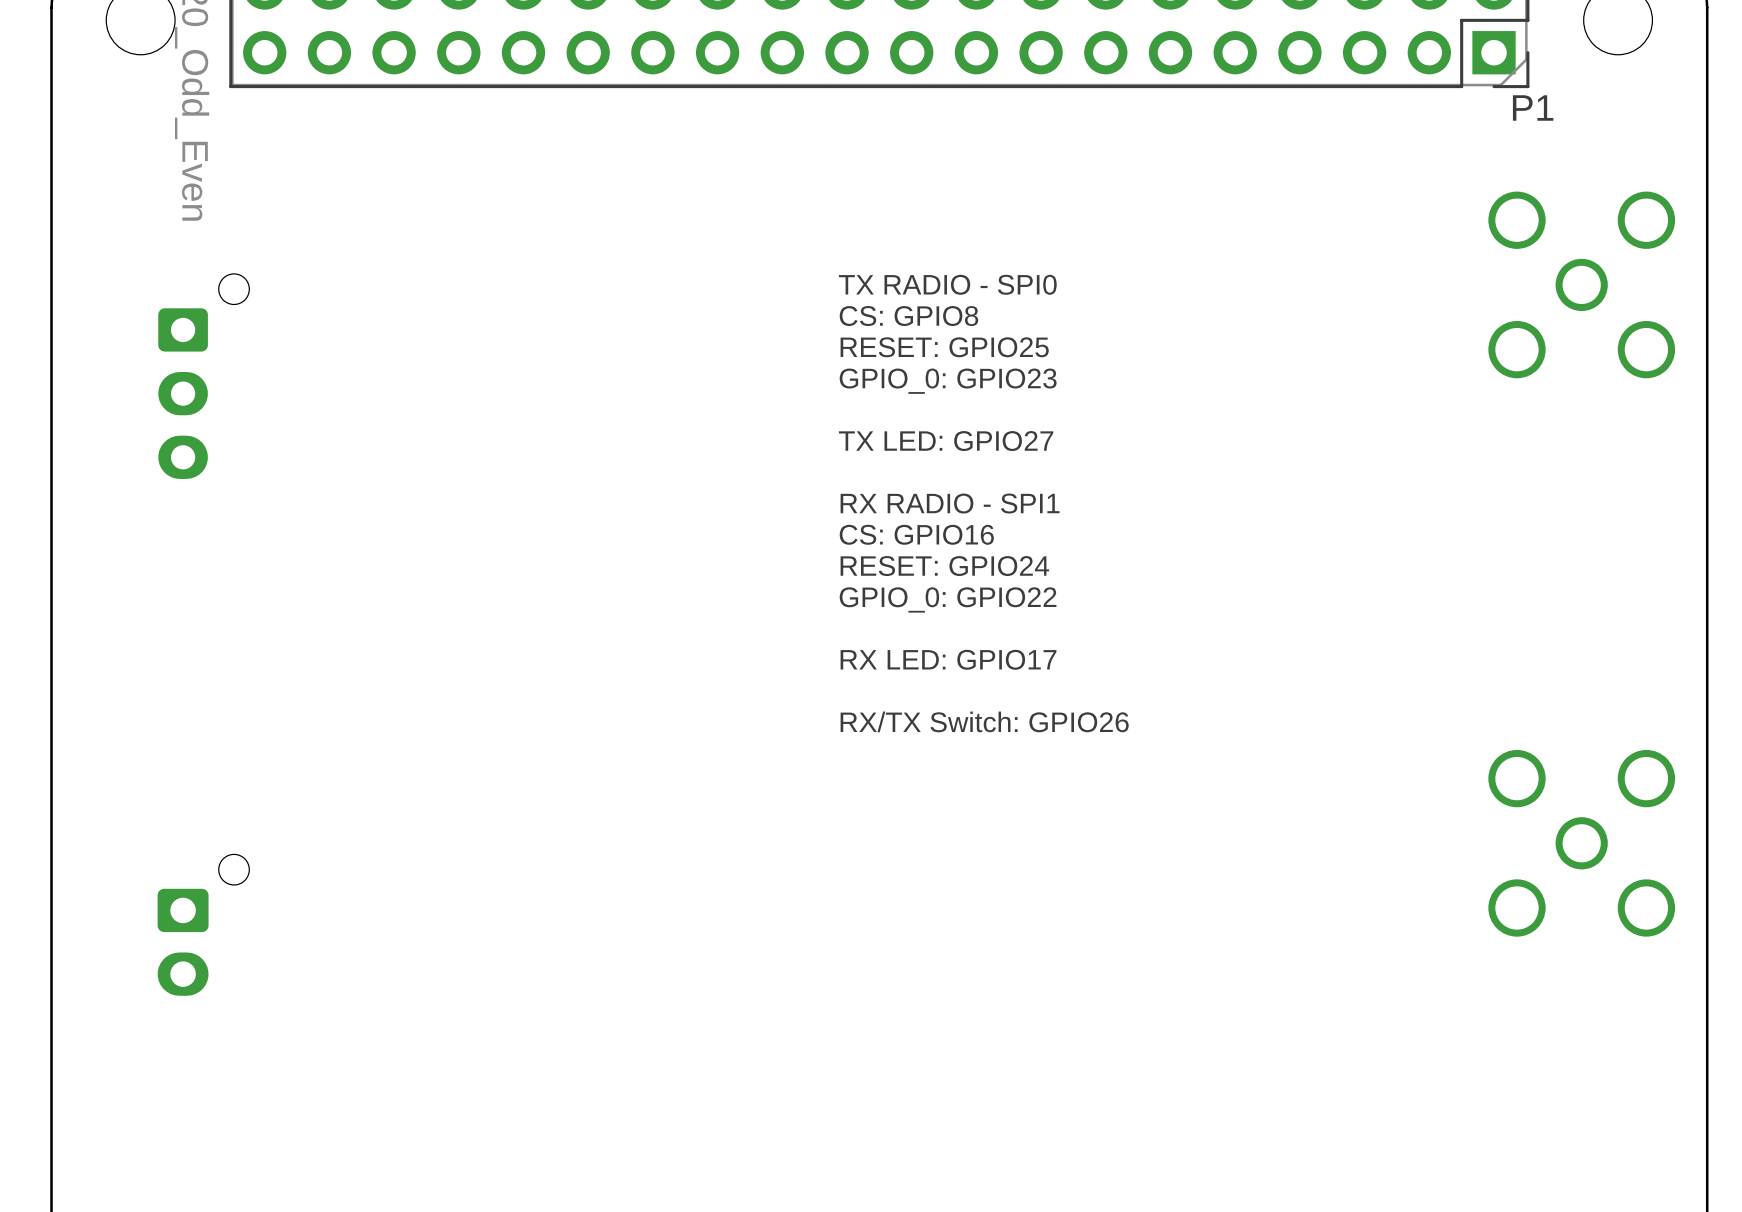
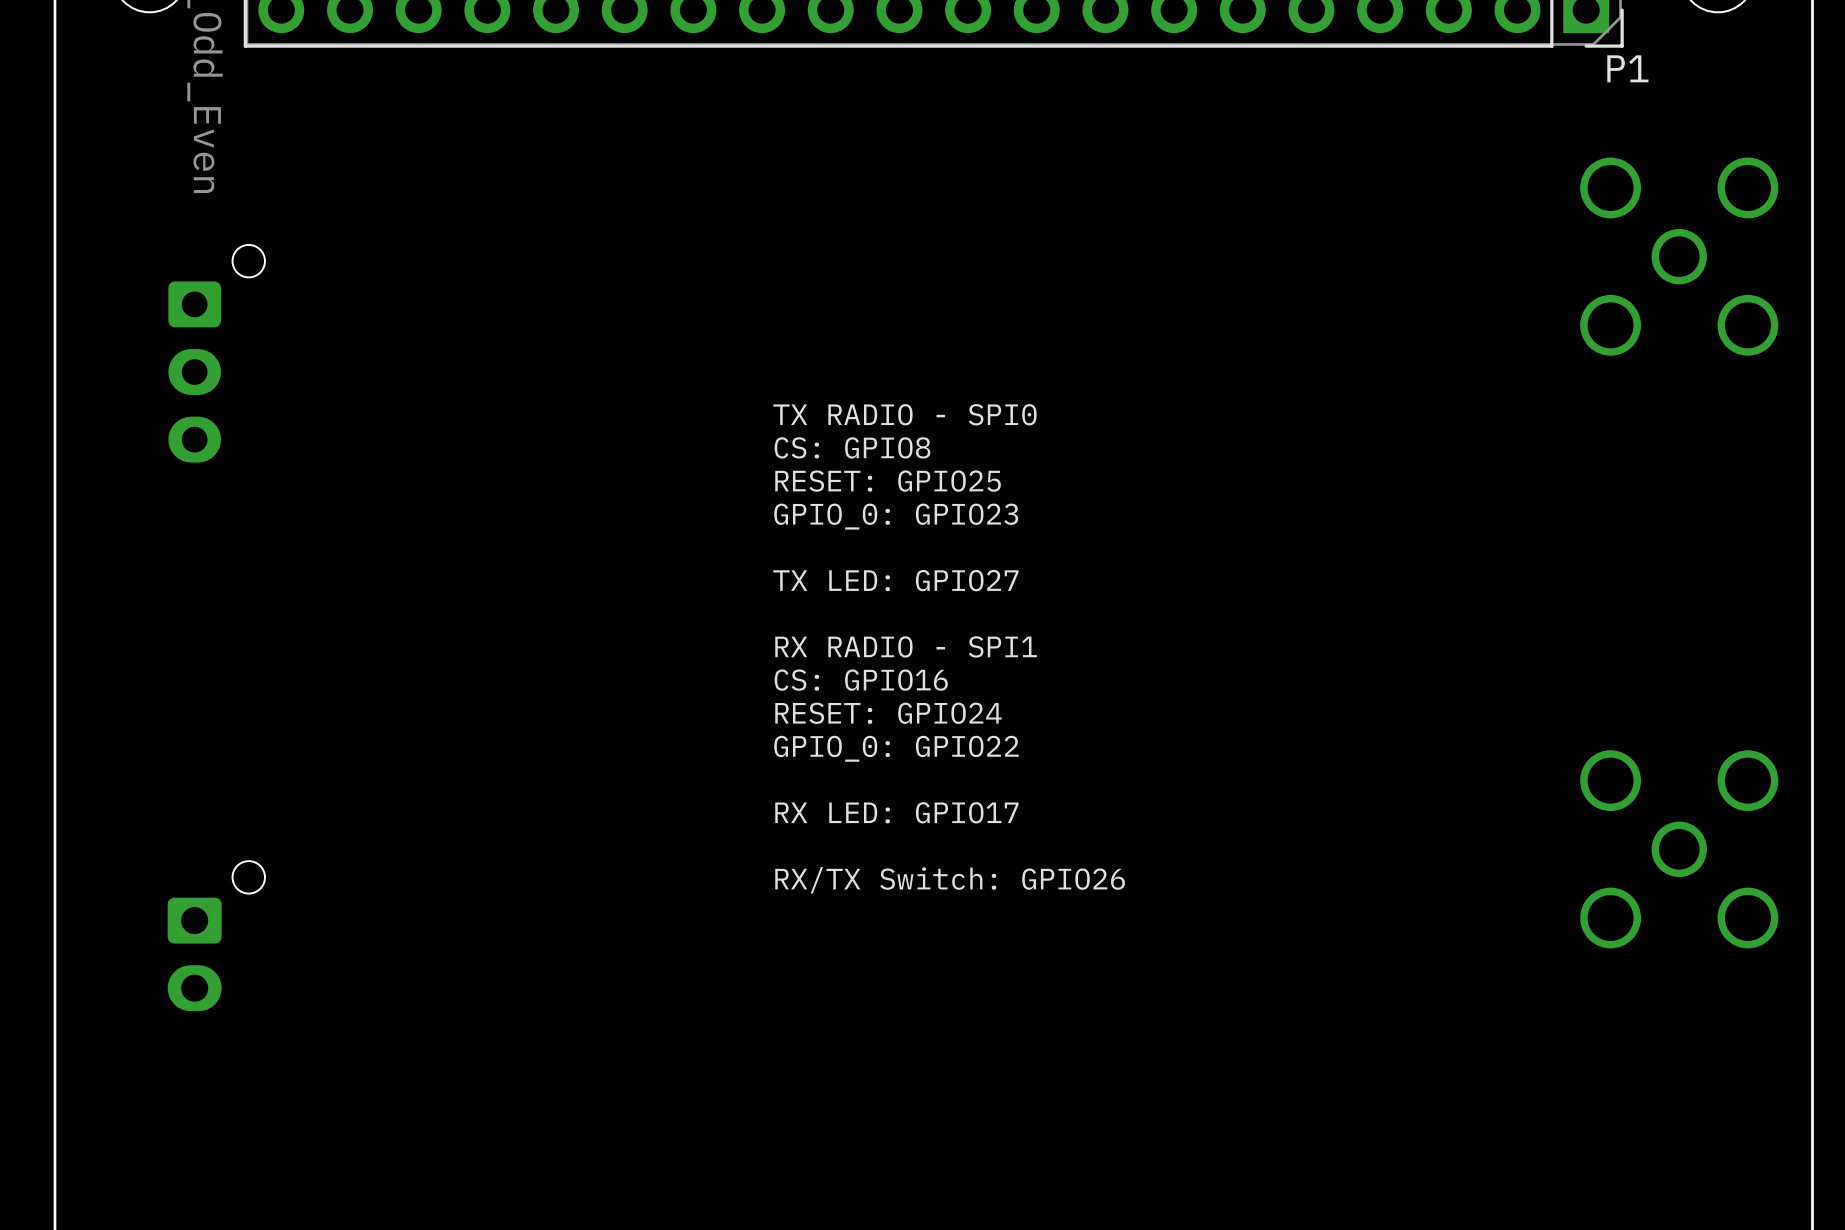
text position: TX RADIO - SPI0 (947, 284) -> TX RADIO - SPI0 (904, 414)
text position: CS: GPIO8 (908, 316) -> CS: GPIO8 (852, 447)
text position: RESET: GPIO25 (944, 347) -> RESET: GPIO25 (888, 481)
text position: GPIO_0: GPIO23 (948, 381) -> GPIO_0: GPIO23 (896, 516)
text position: TX LED: GPIO27 (946, 441) -> TX LED: GPIO27 (895, 580)
text position: RX RADIO - SPI1 (950, 503) -> RX RADIO - SPI1 (906, 646)
text position: CS: GPIO16 (916, 534) -> CS: GPIO16 (861, 680)
text position: RESET: GPIO24 (944, 566) -> RESET: GPIO24 (888, 713)
text position: GPIO_0: GPIO22 (948, 599) -> GPIO_0: GPIO22 (896, 748)
text position: RX LED: GPIO17 (948, 659) -> RX LED: GPIO17 (896, 812)
text position: RX/TX Switch: GPIO26 (984, 721) -> RX/TX Switch: GPIO26 (950, 880)

